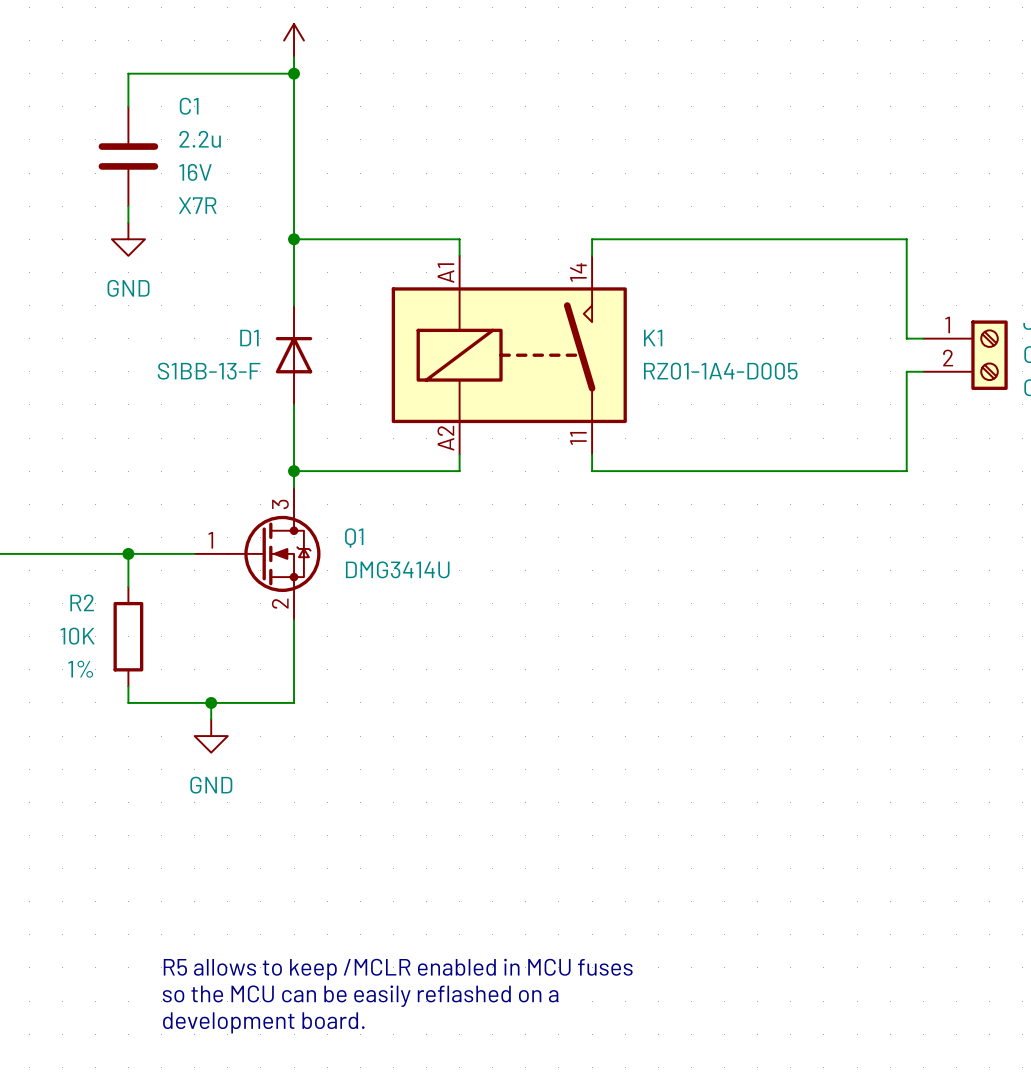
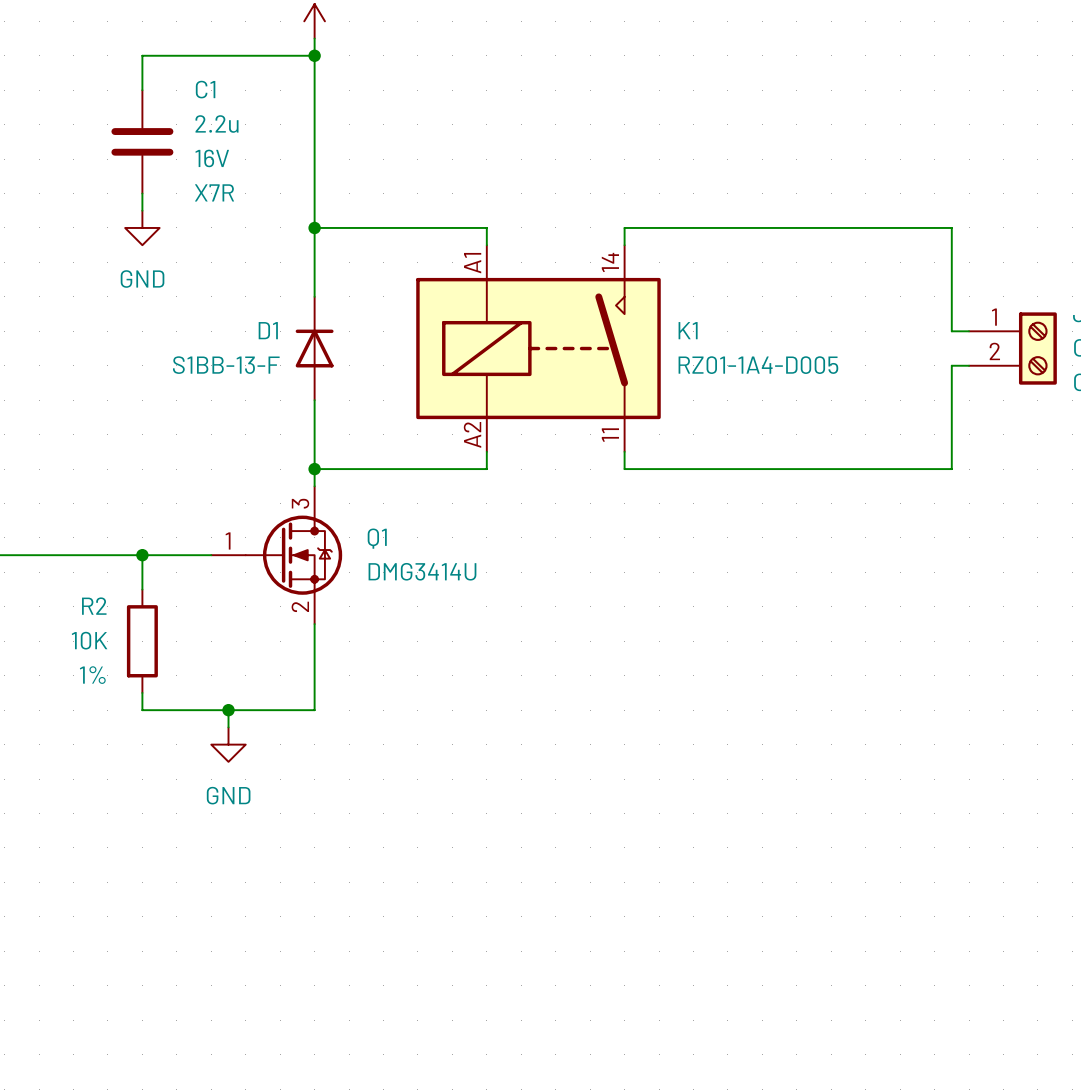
text: R5 allows to keep /MCLR enabled in MCU fuses (398, 969) -> none
text: so the MCU can be easily reflashed on a (360, 996) -> none
text: development board. (263, 1022) -> none

